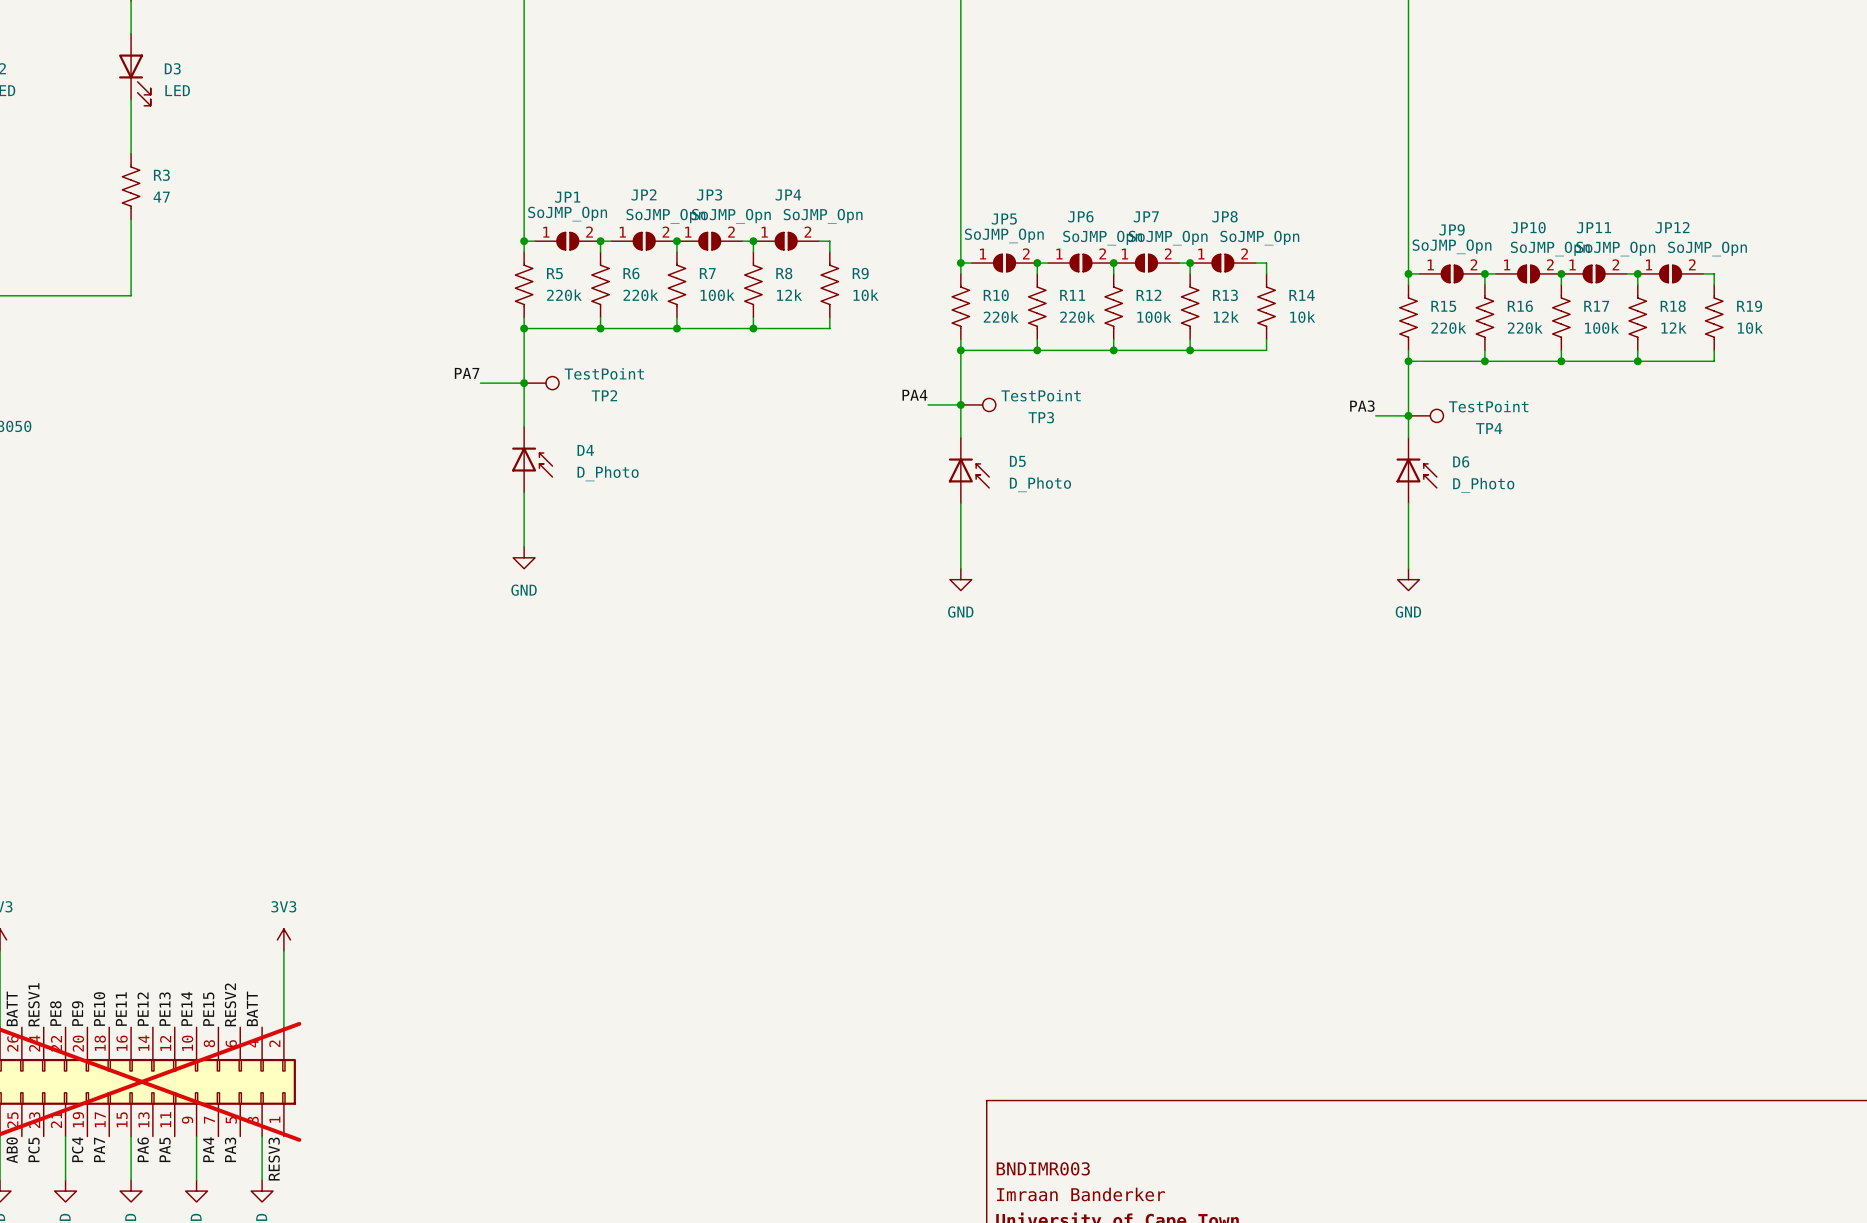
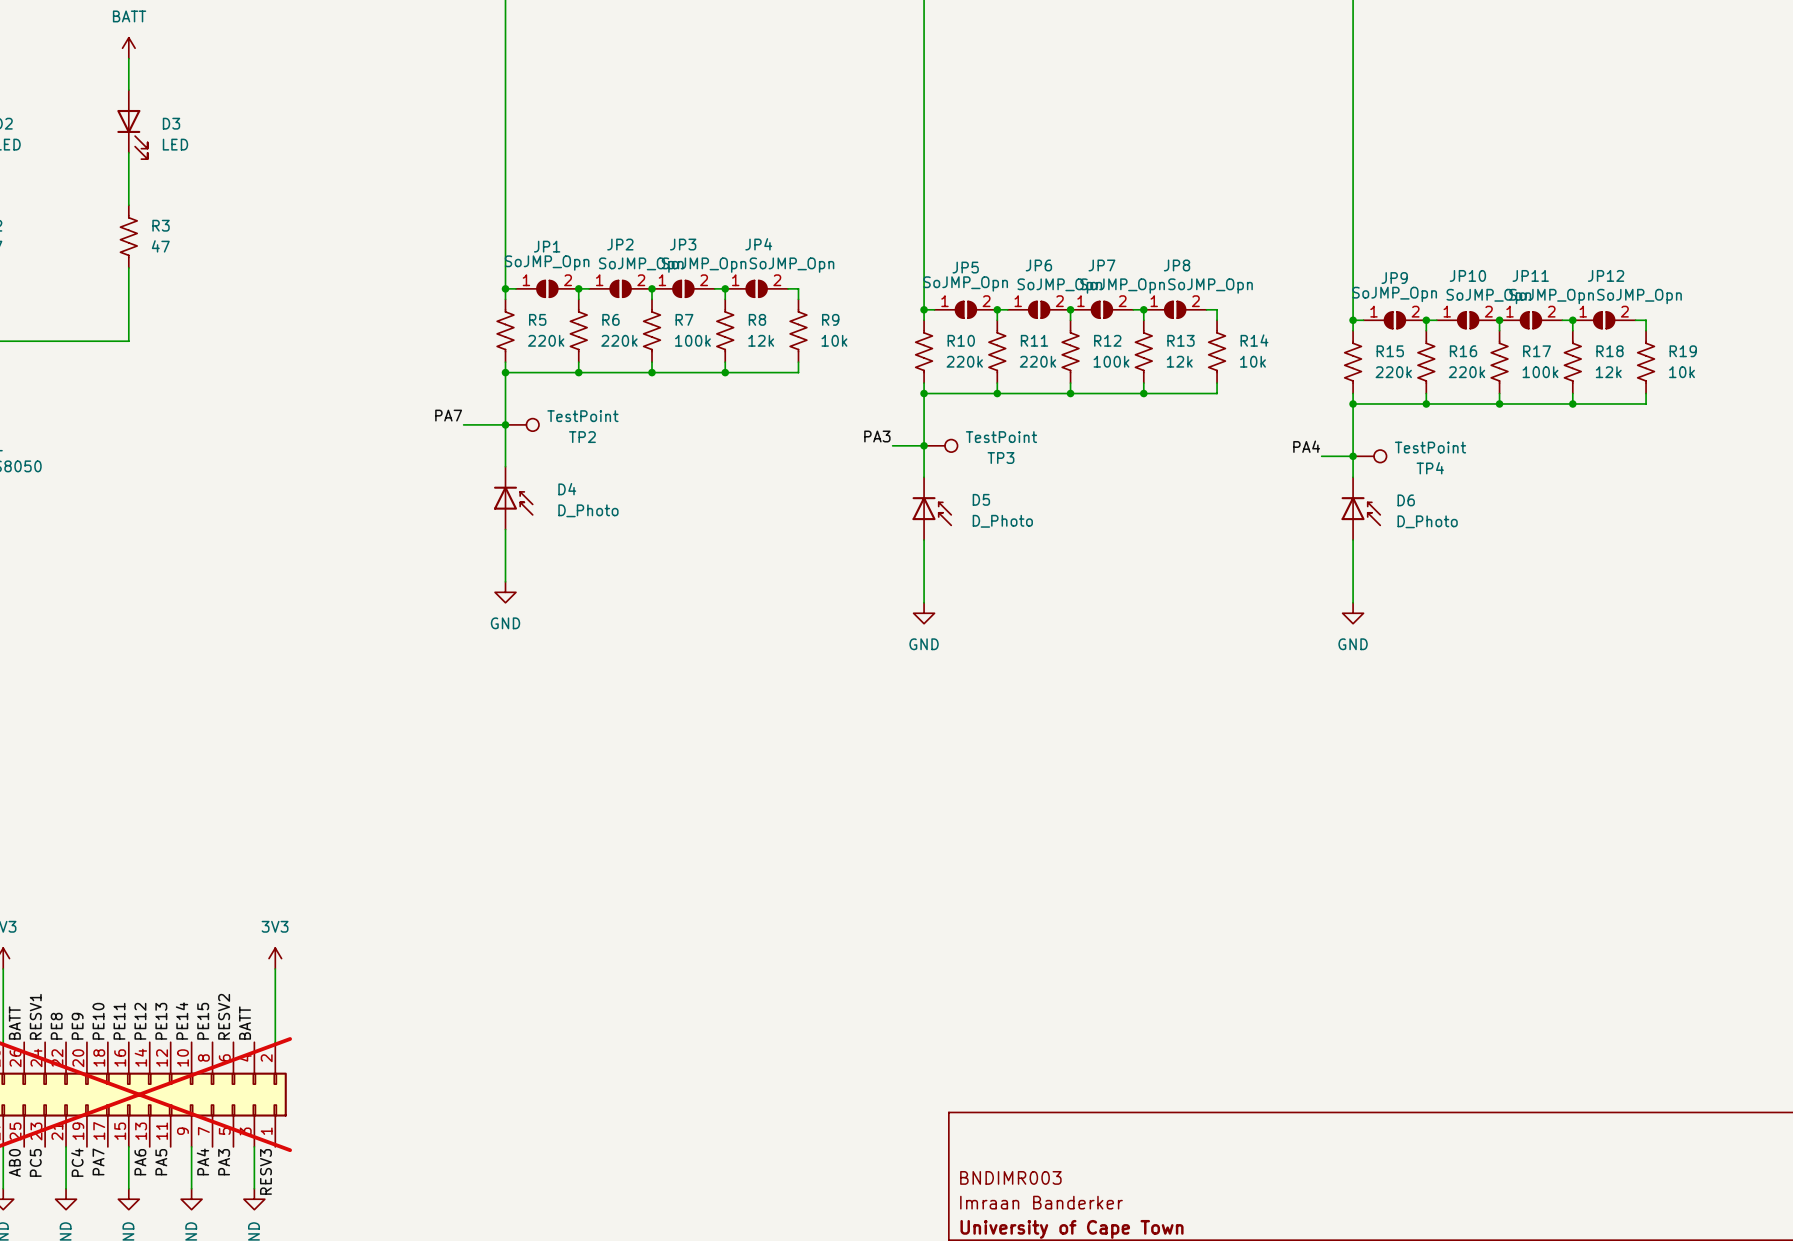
label: PA4 (914, 395) -> PA3 (877, 436)
label: PA3 (1362, 406) -> PA4 (1306, 446)

